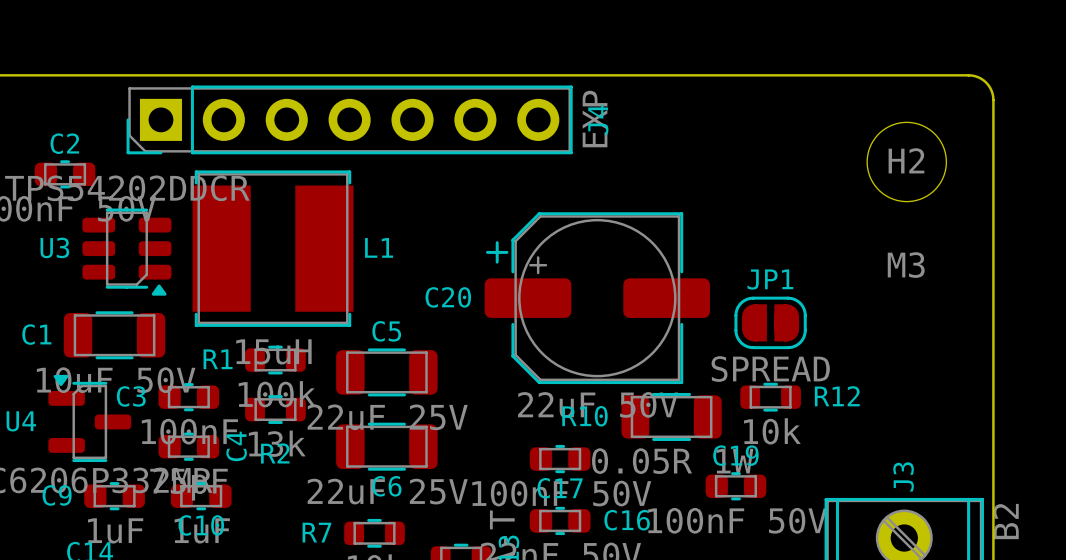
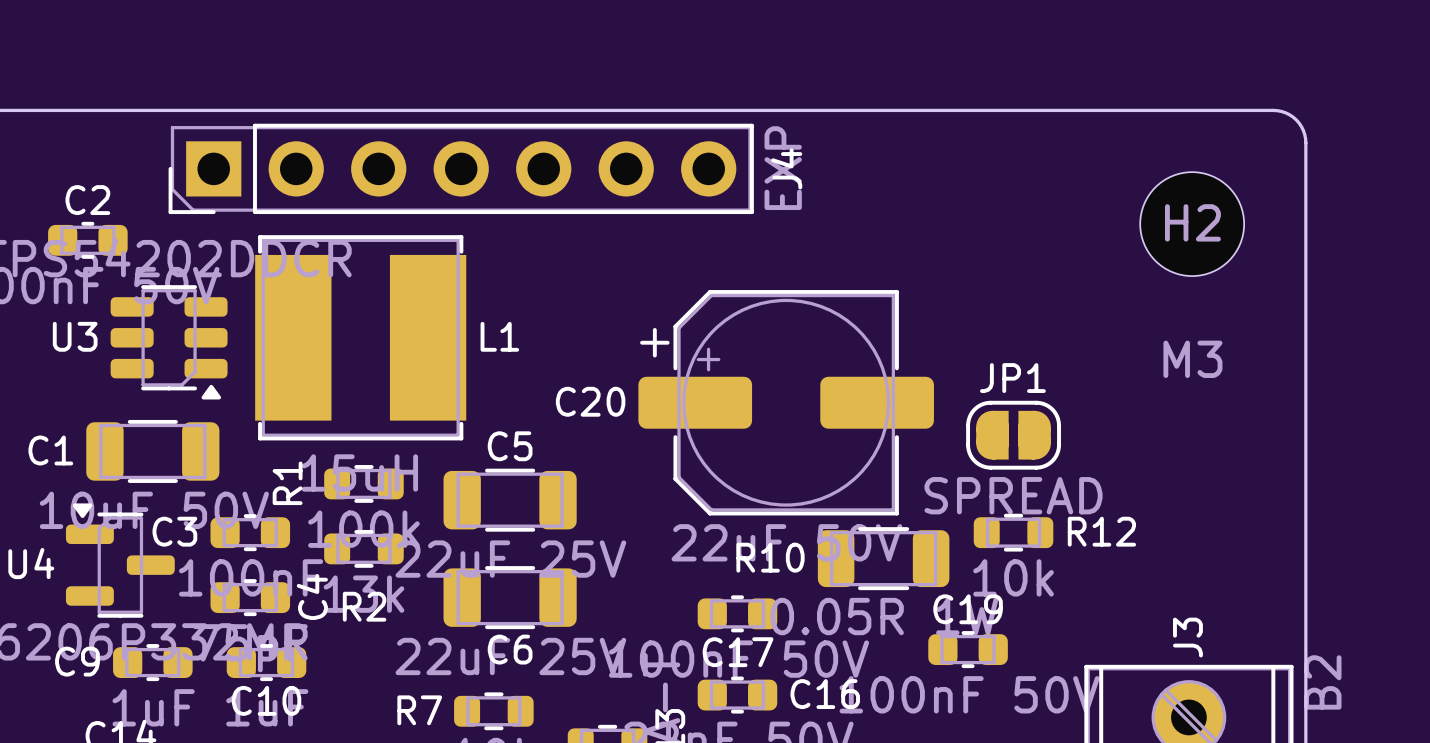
R1 name rotation: 0° (218, 359) -> 90° counterclockwise (287, 483)

